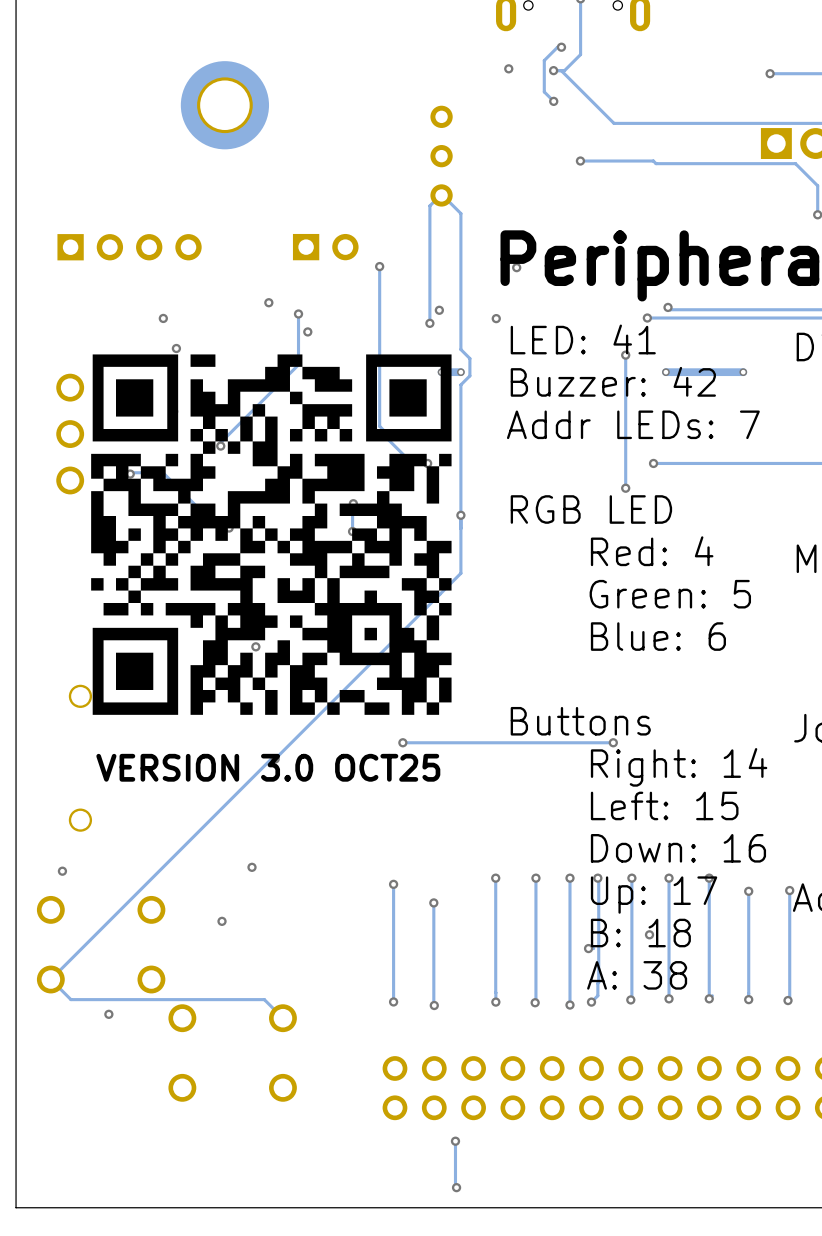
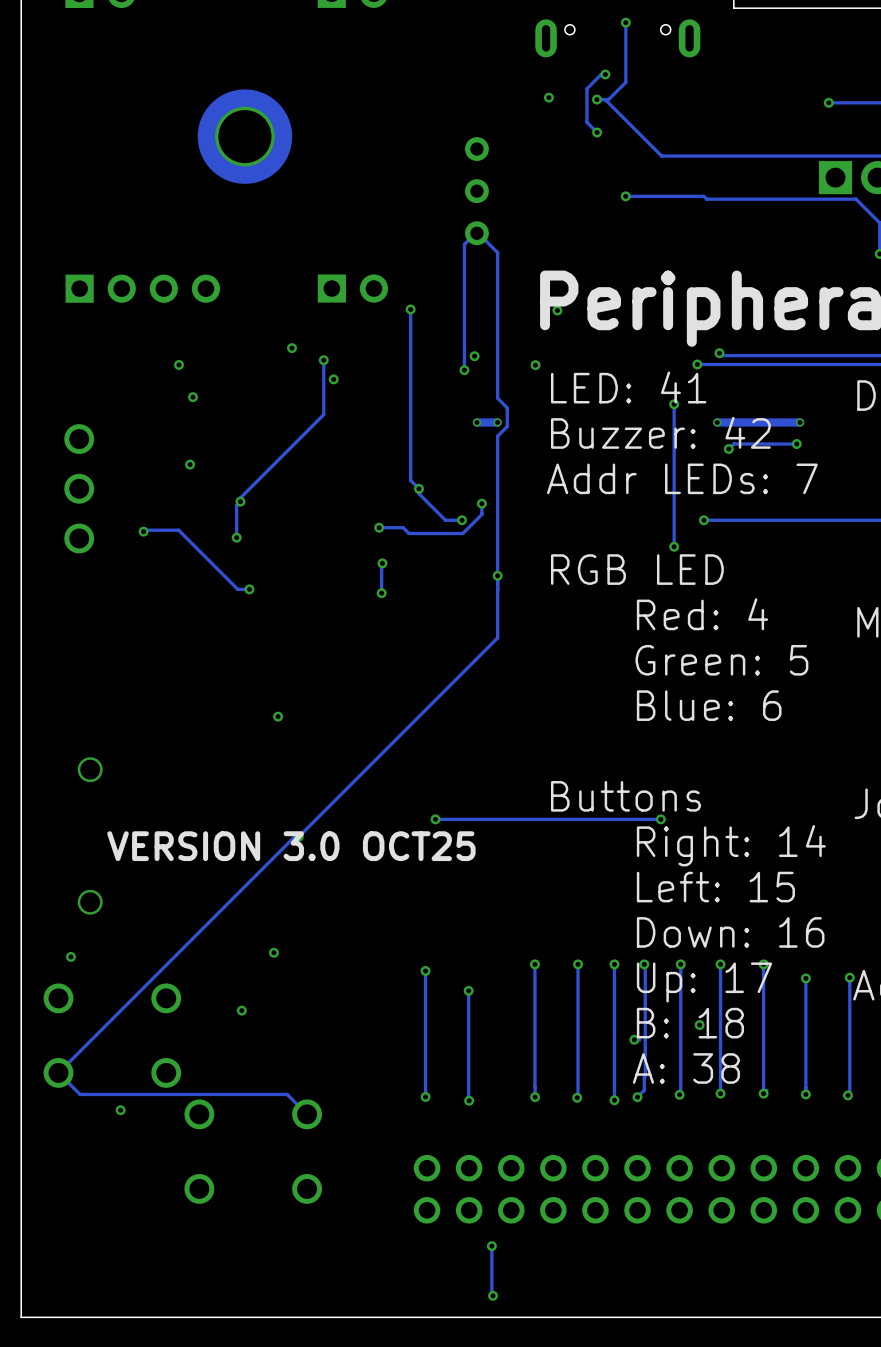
drawing: [91, 354, 452, 715] -> none
track: none -> (796, 444) (733, 444) (727, 450)
via: none -> (796, 444)
via: none -> (728, 449)
track: none -> (240, 501) (236, 505) (236, 537)
track: none -> (481, 503) (481, 514) (462, 533) (409, 533) (403, 527) (379, 527)
via: none -> (481, 503)
via: none -> (379, 527)
via: none -> (236, 537)

